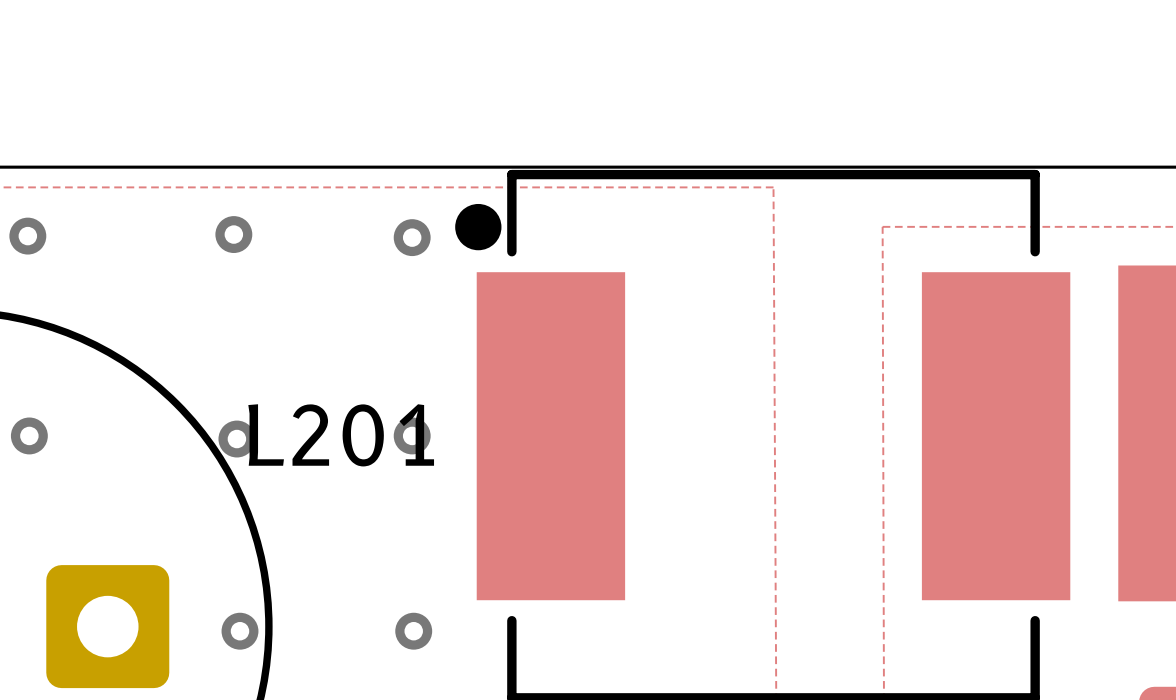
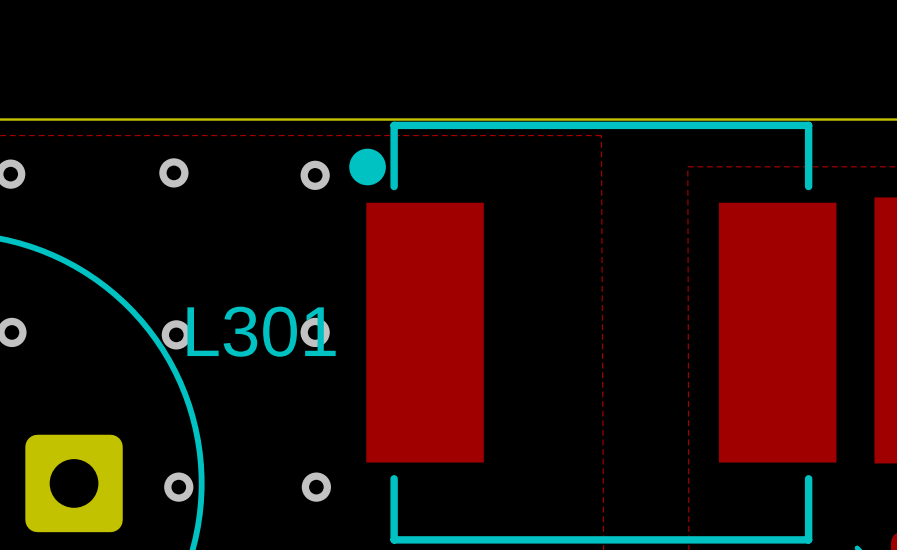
L201 name: L201 (341, 435) -> L301 (261, 331)

